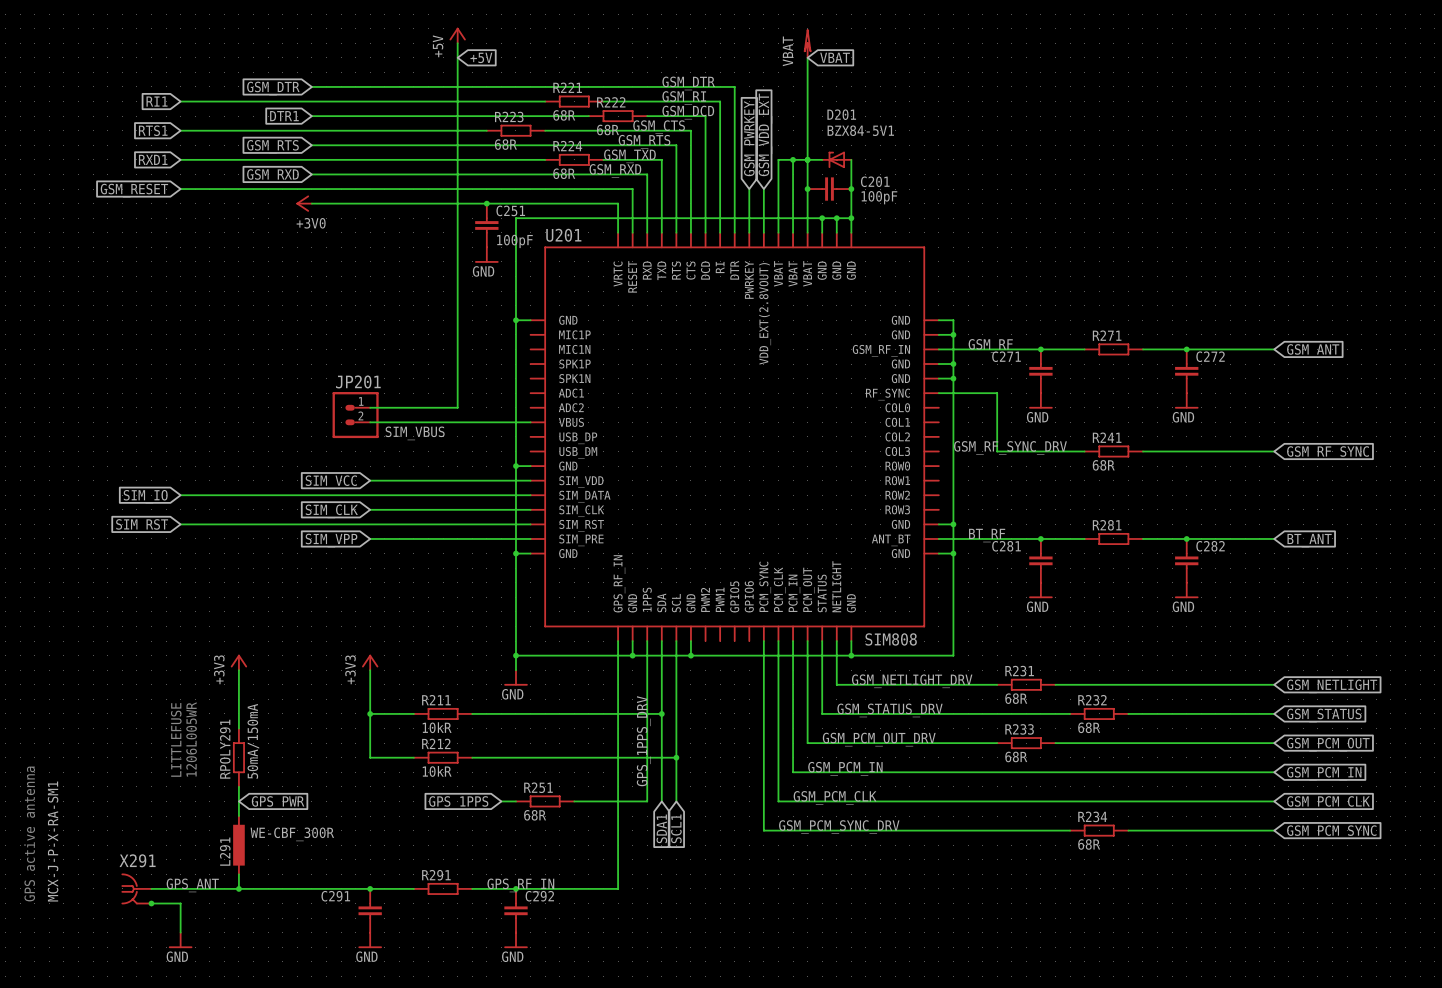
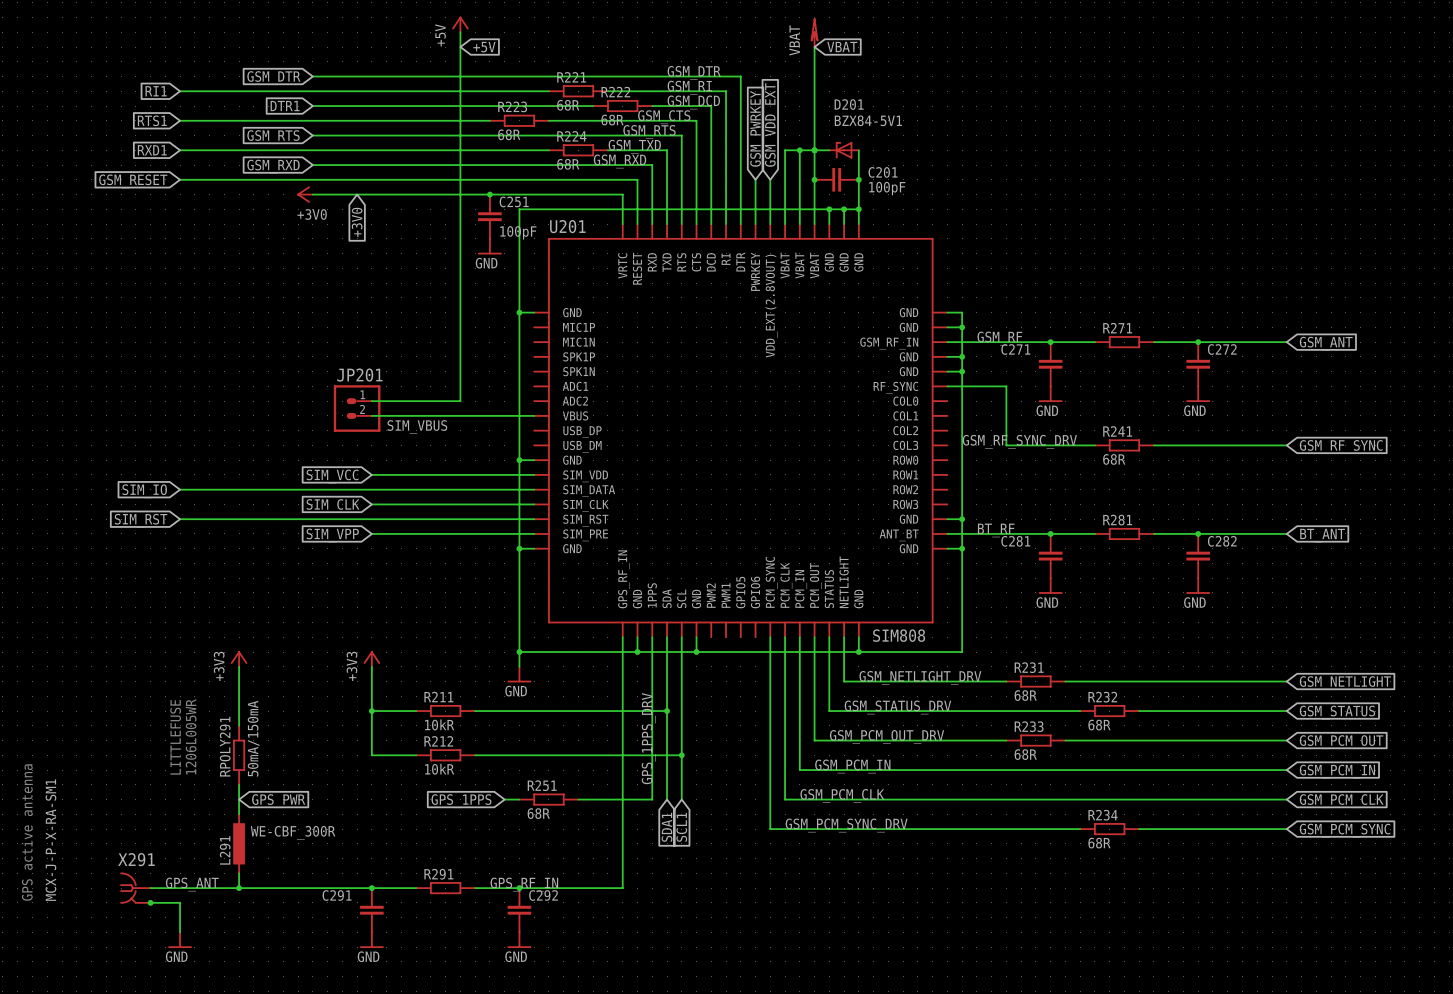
global label: none -> +3V0 (357, 222)

